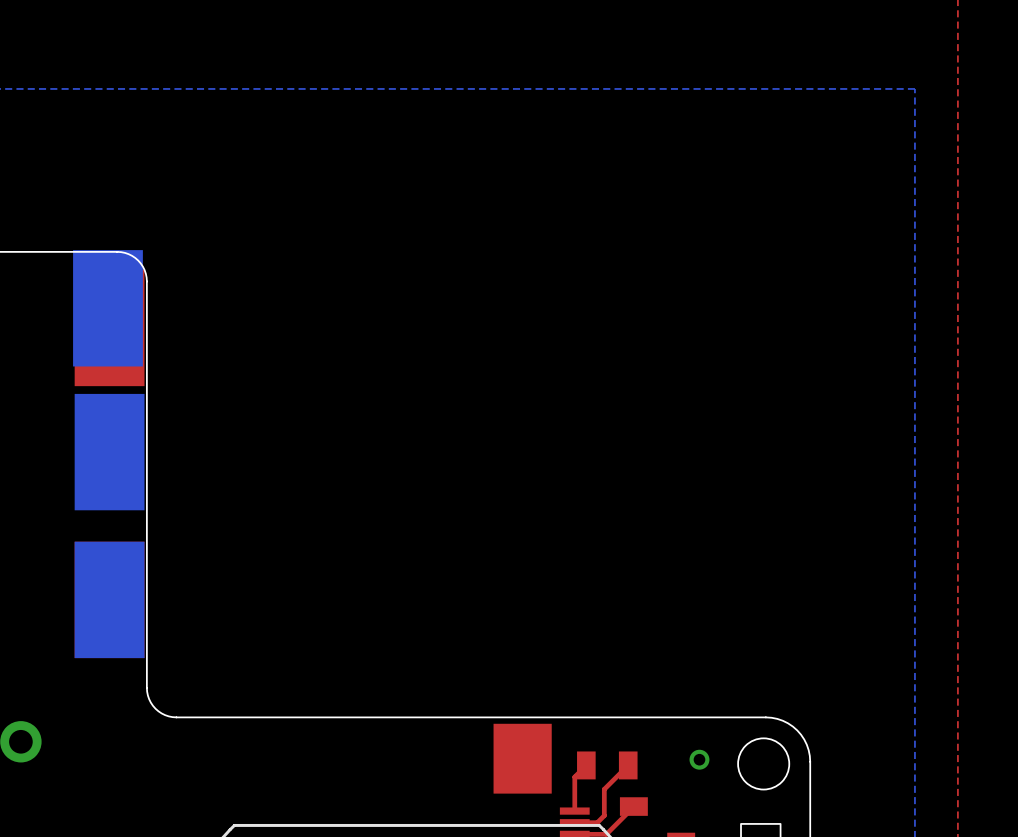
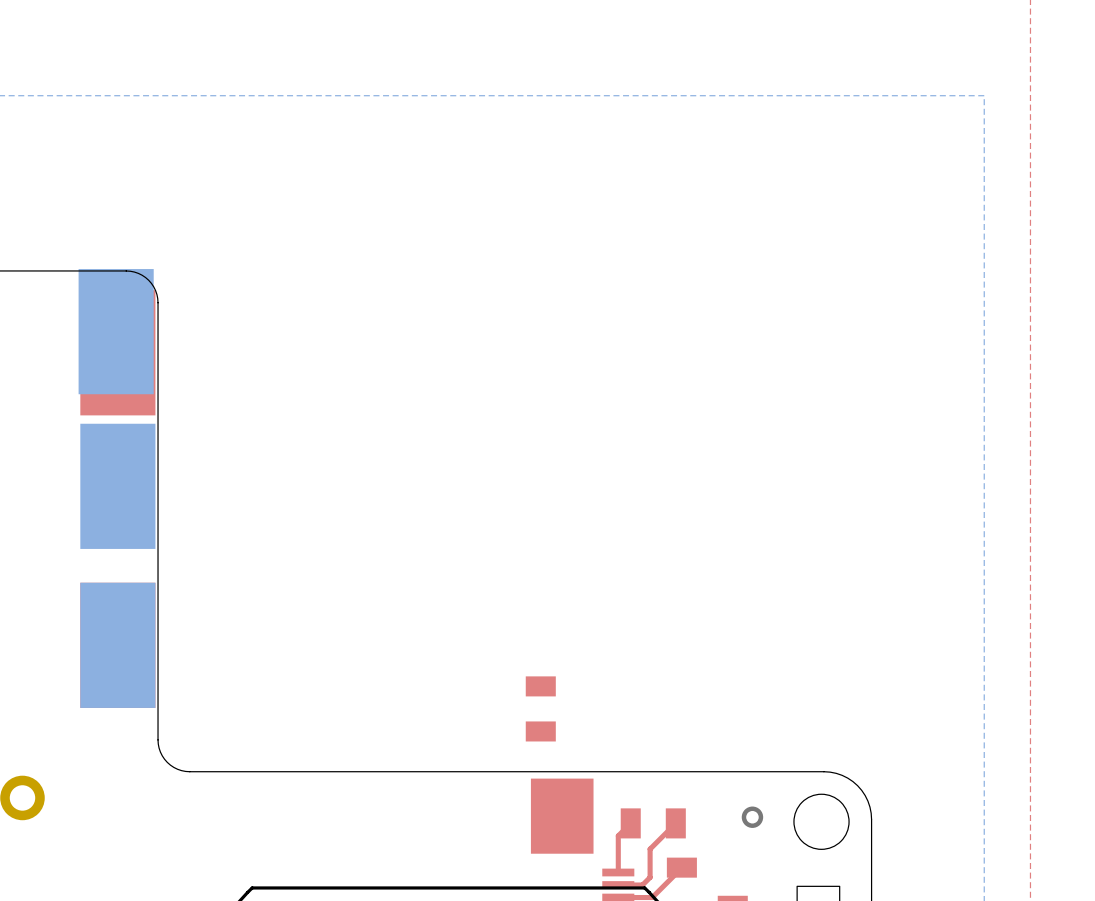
part: none -> (540, 708)

